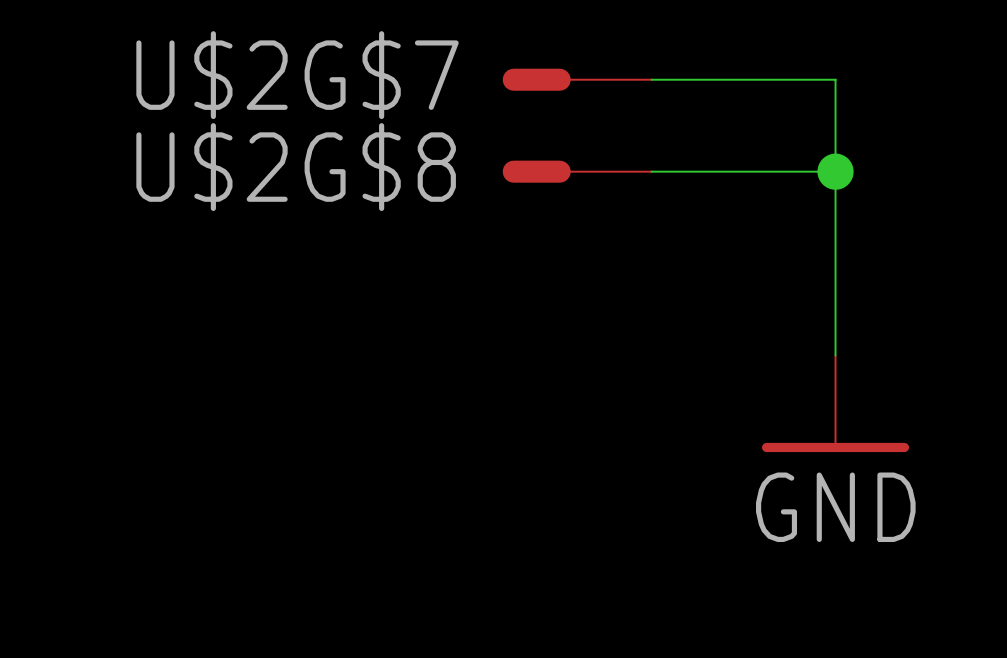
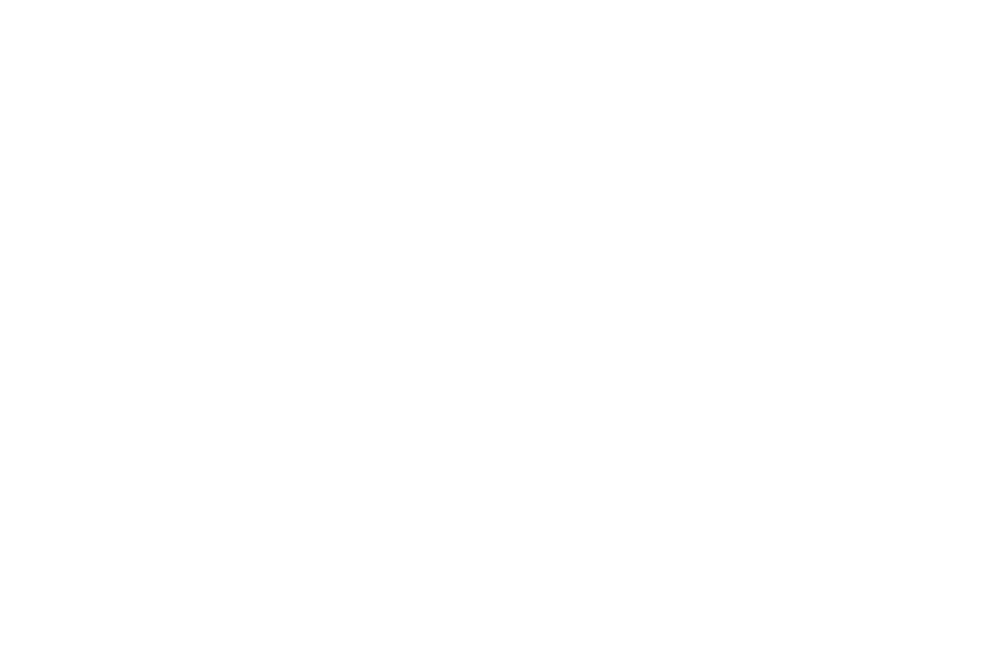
U$2G$7: (577, 79) -> none
wire: (651, 79) (835, 79) (835, 355) -> none
U$2G$8: (577, 171) -> none
wire: (651, 171) (835, 171) -> none
junction: (835, 171) -> none
power symbol: GND (835, 403) -> none

